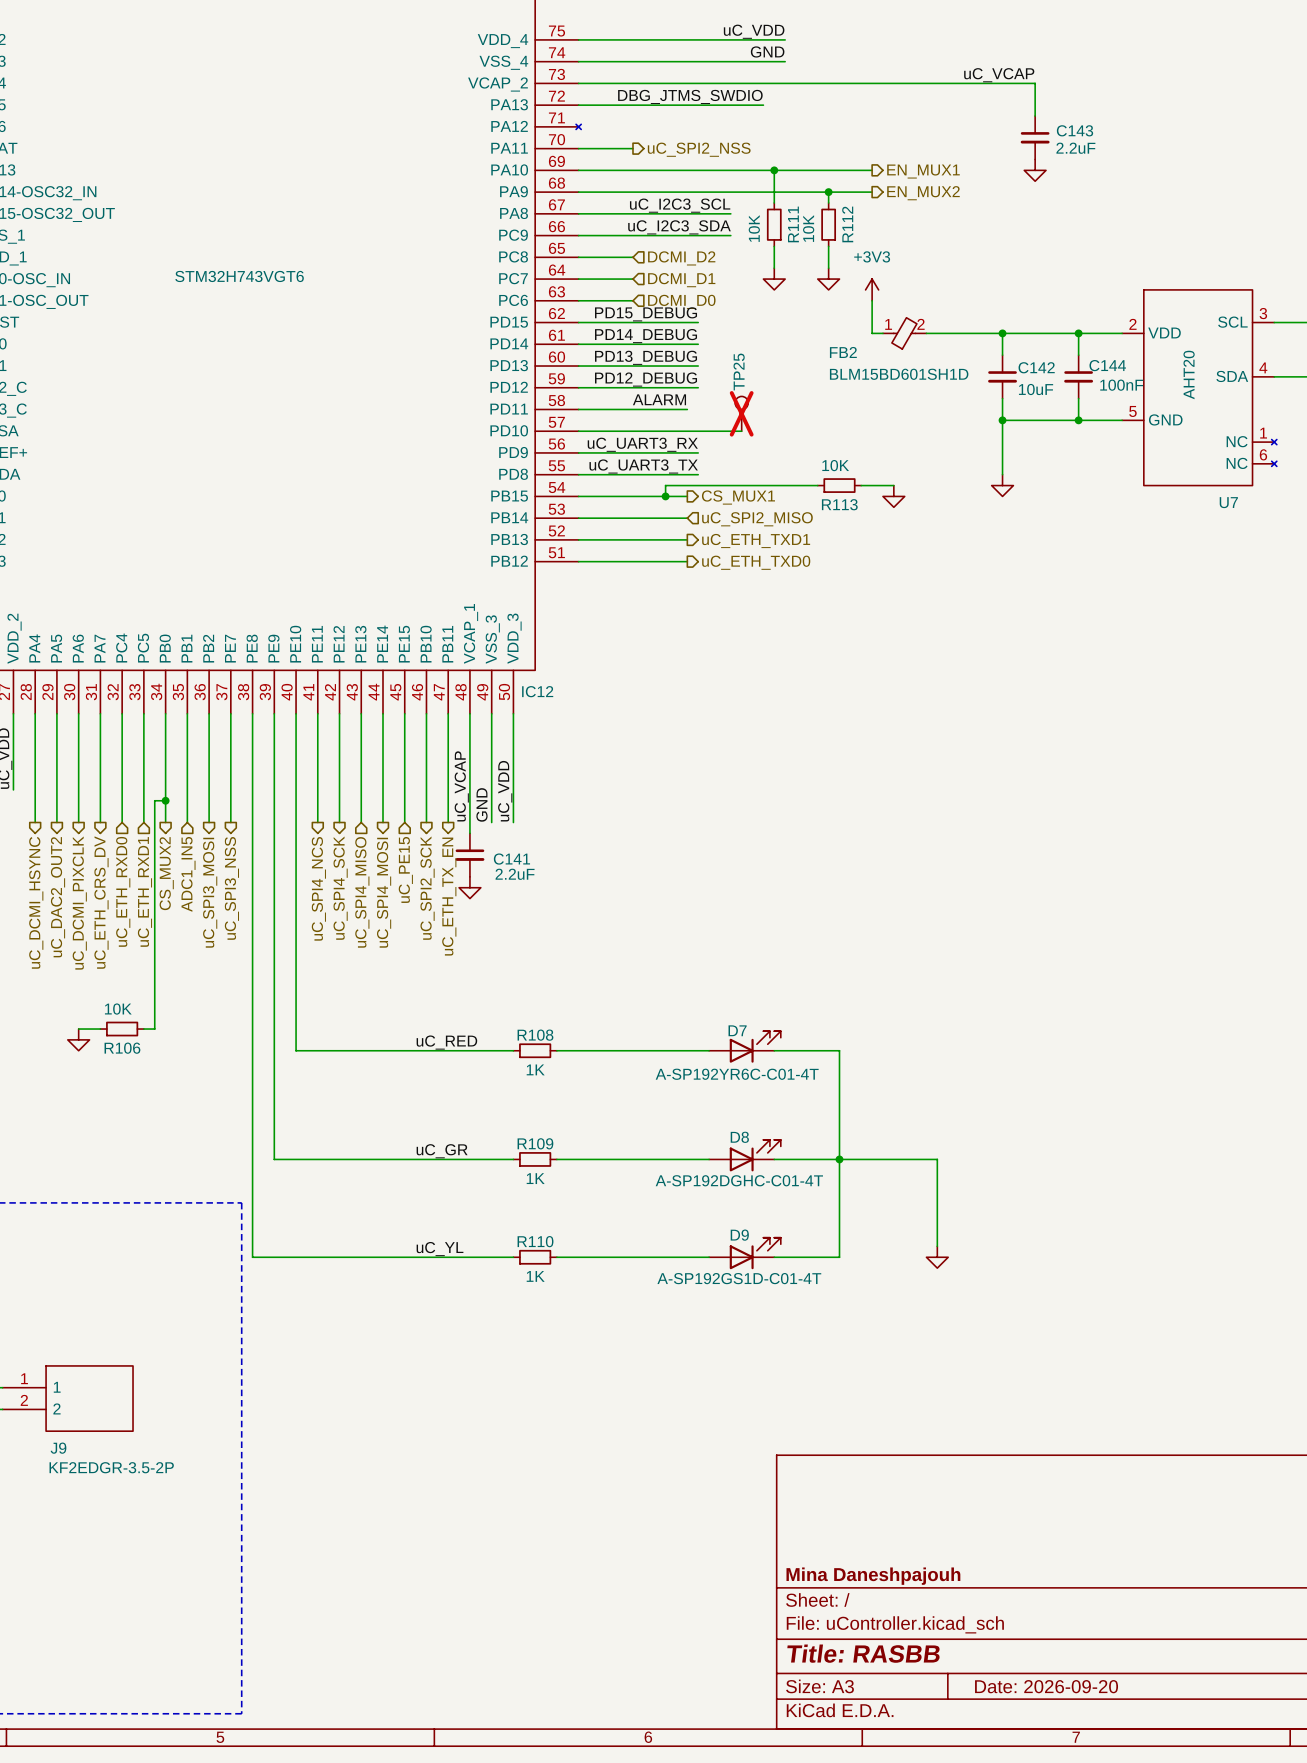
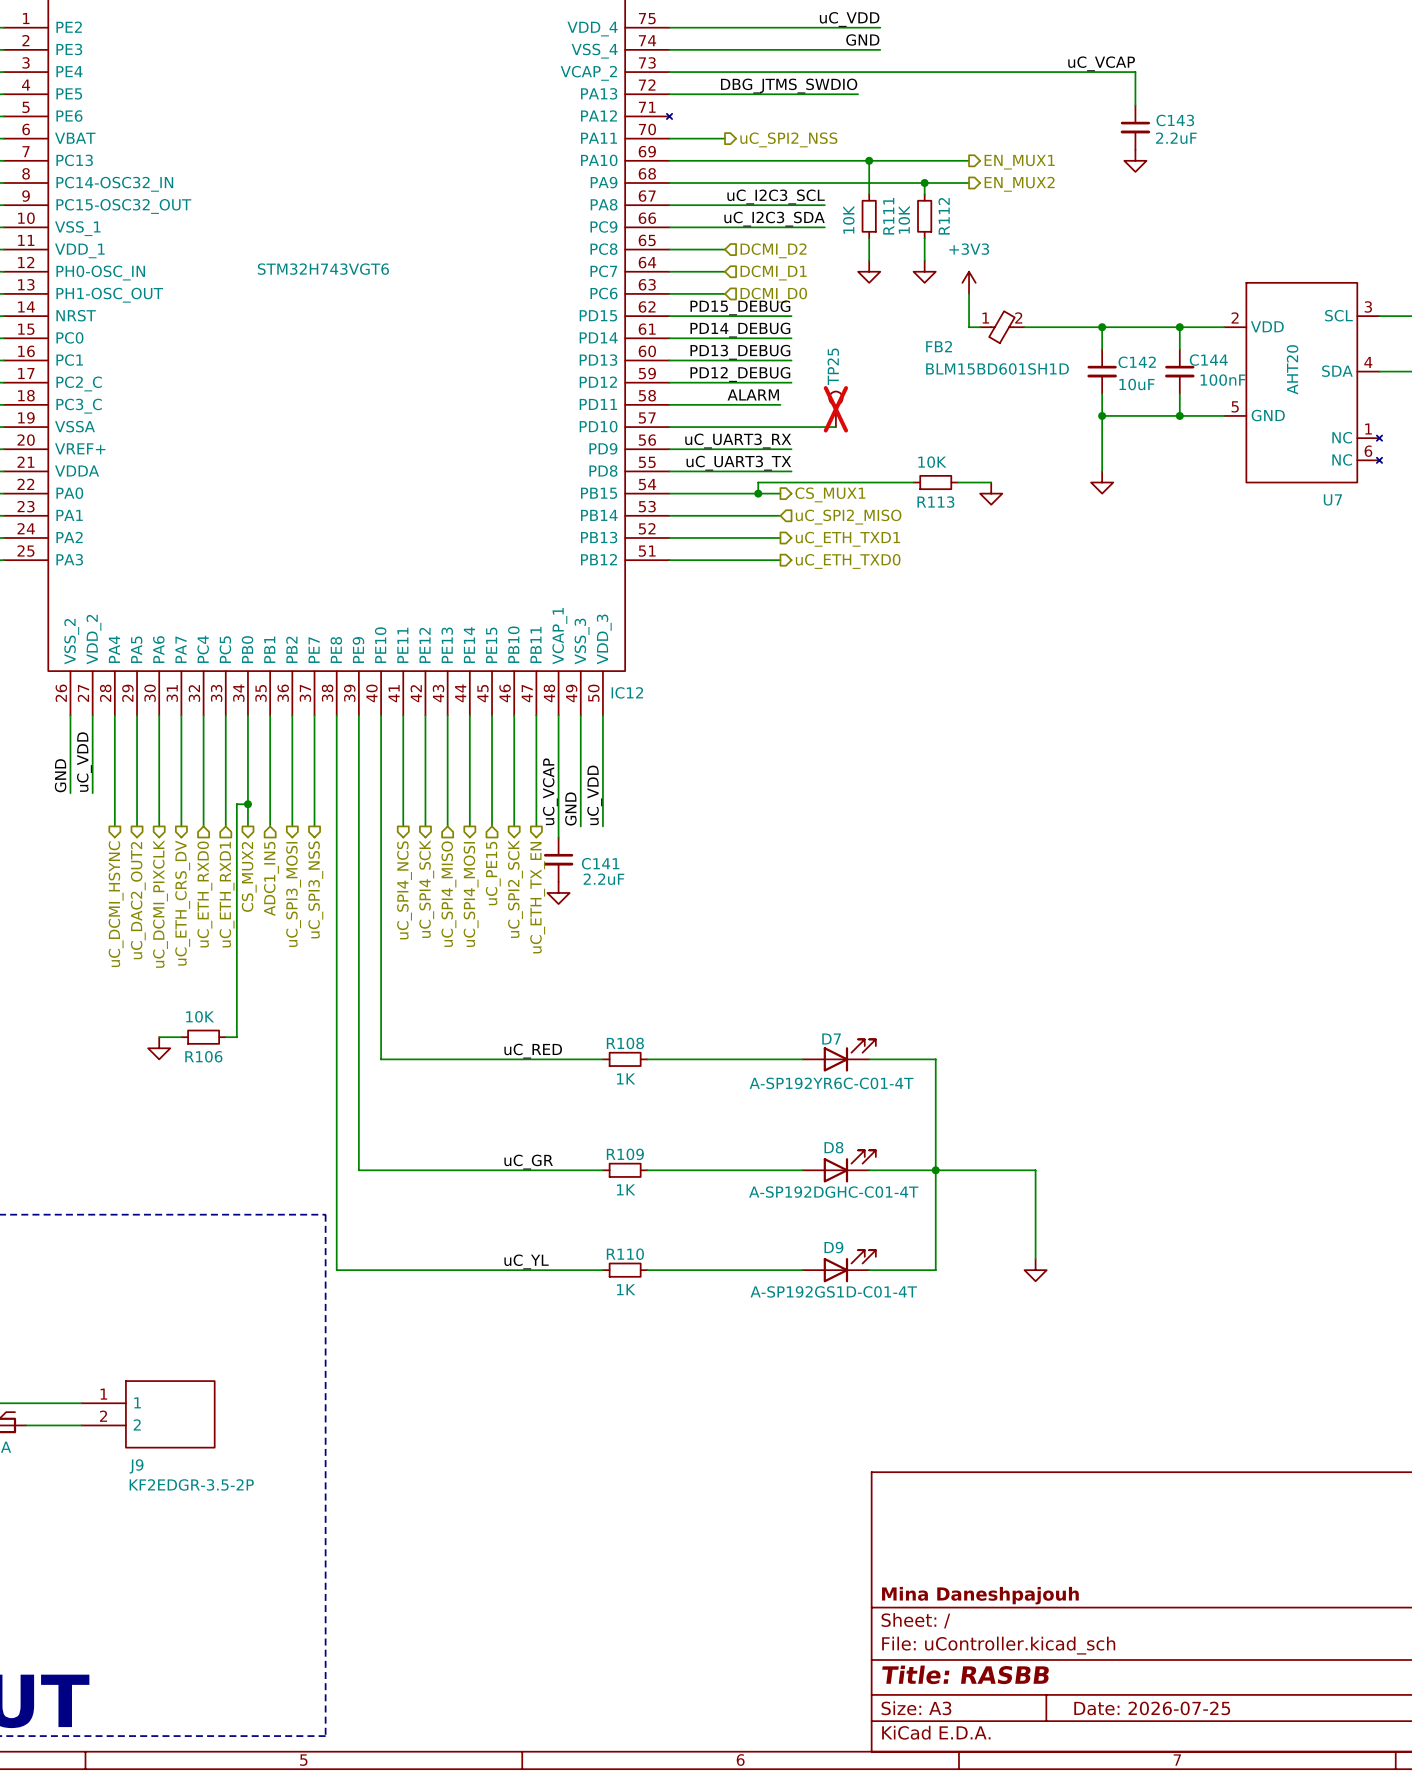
title block: Date: 2026-09-20 (1046, 1686) -> Date: 2026-07-25 (1152, 1708)

